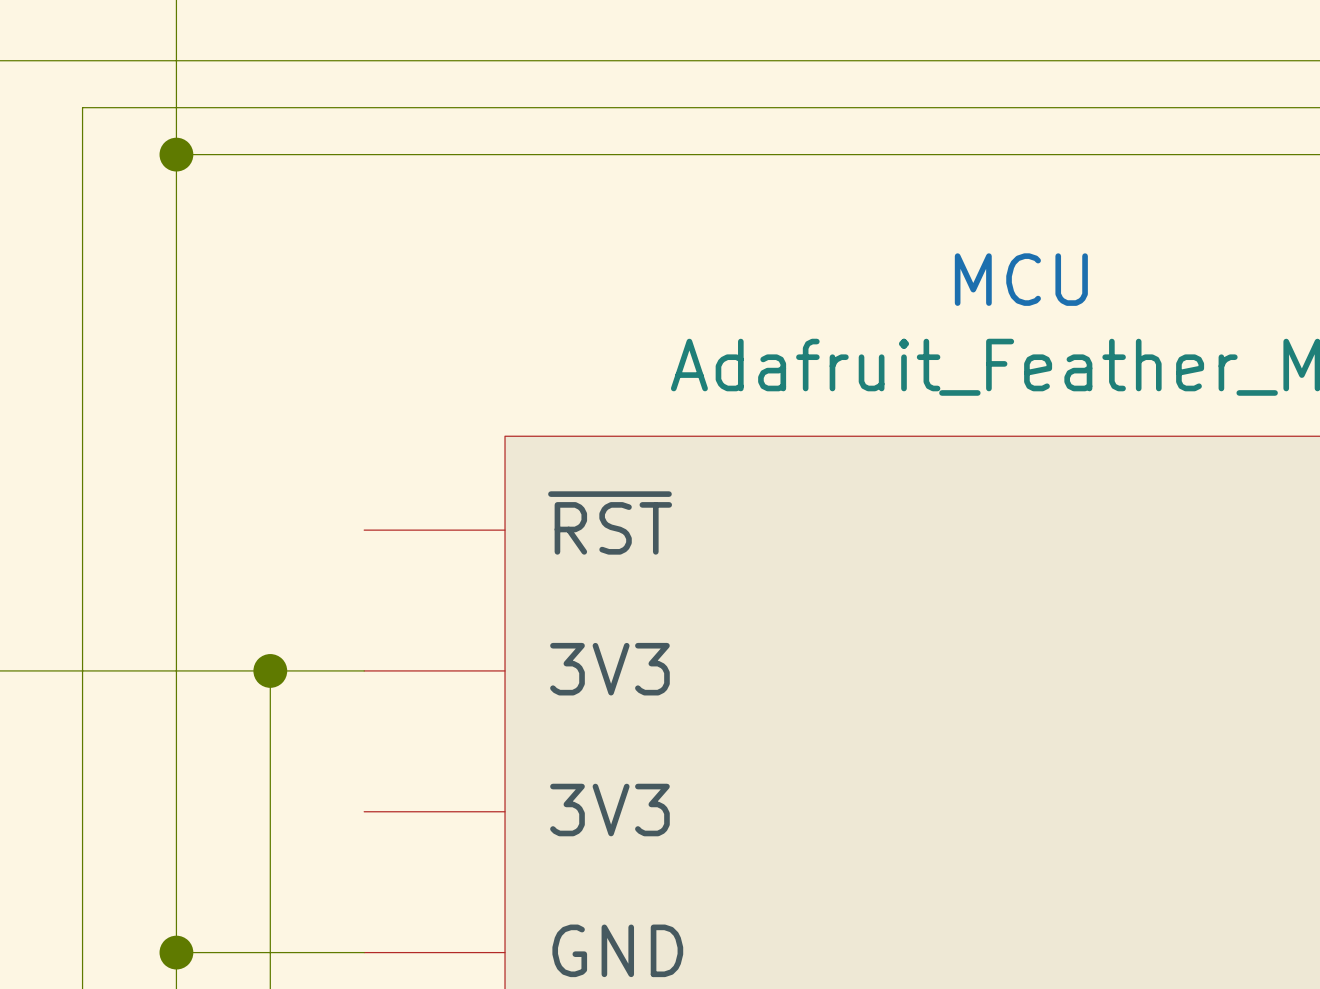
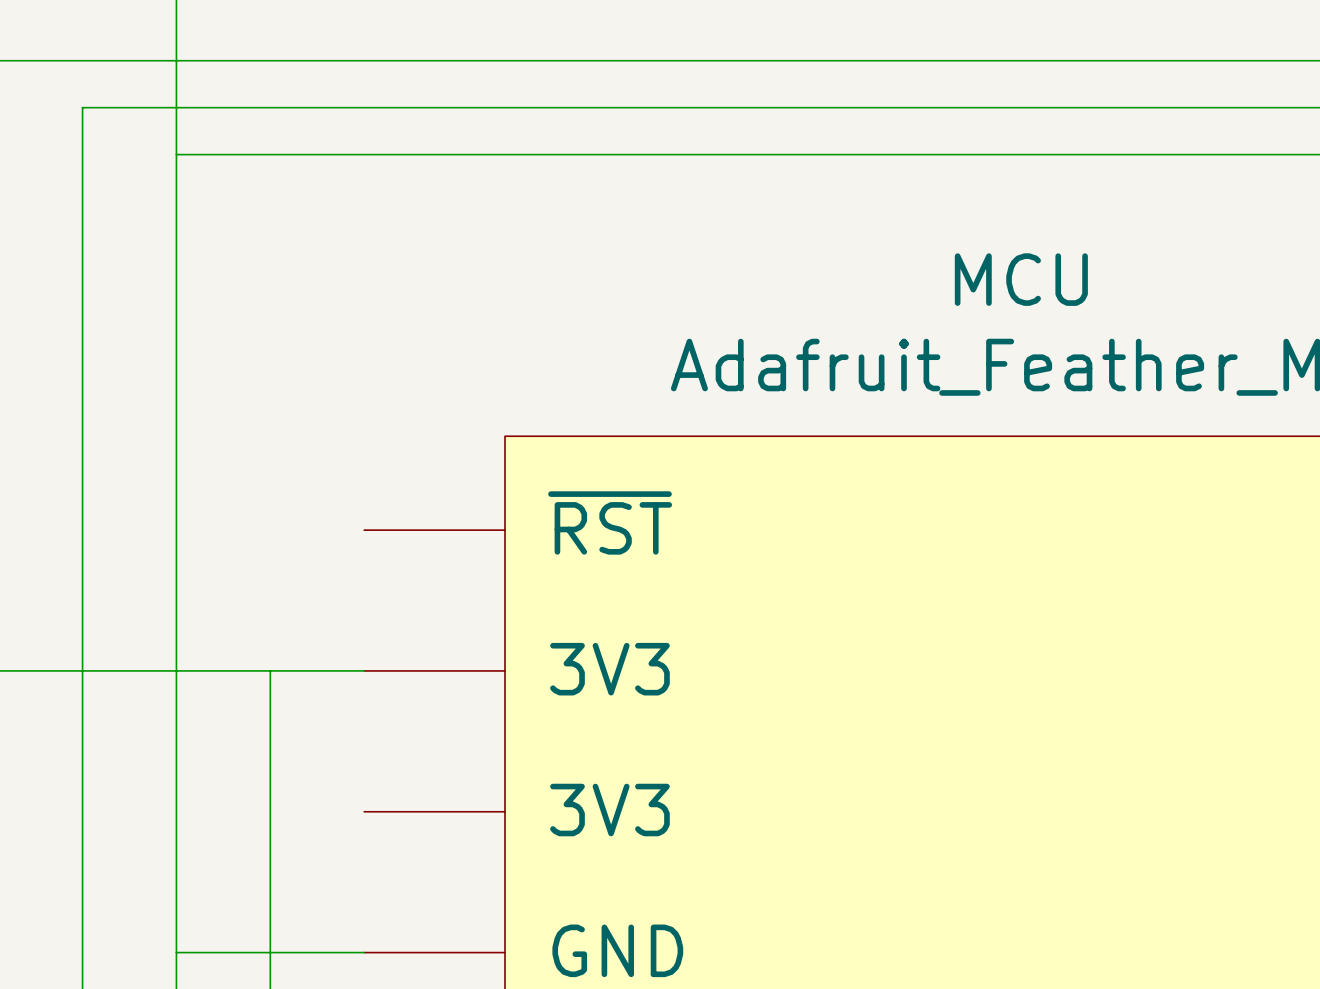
junction: (176, 154) -> none
junction: (270, 670) -> none
junction: (176, 952) -> none

